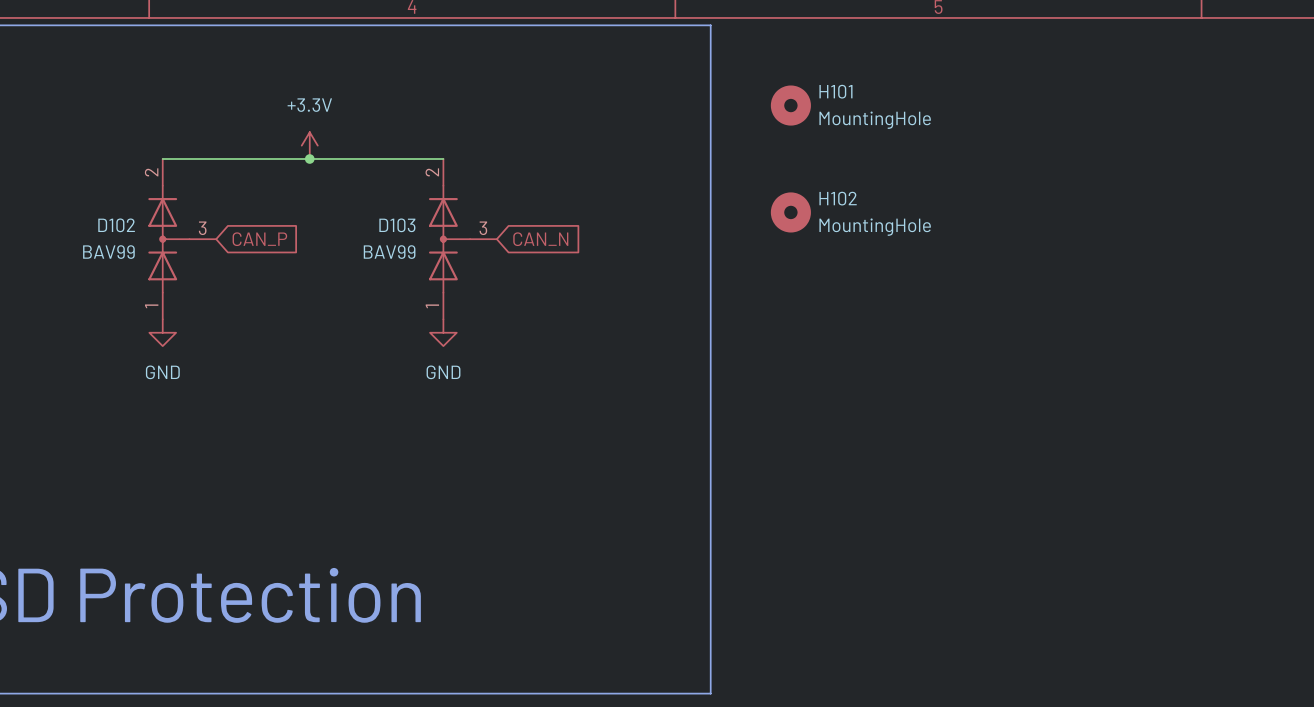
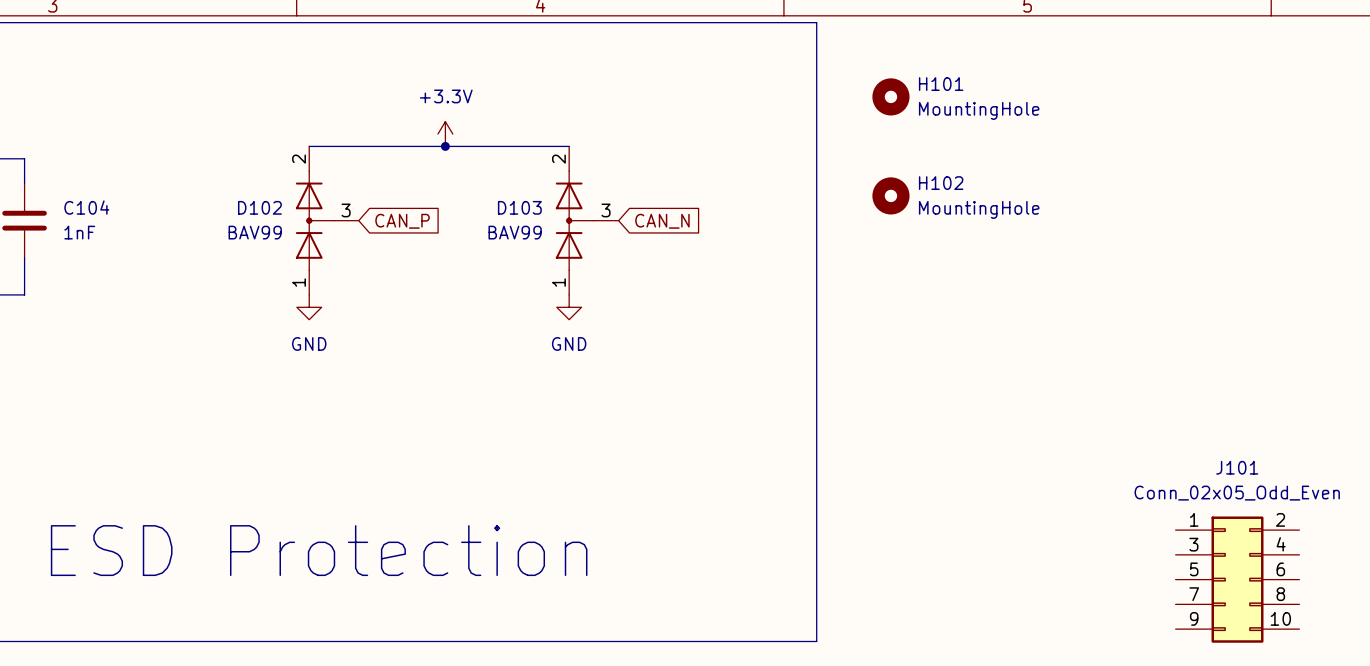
J101: none -> Conn_02x05_Odd_Even (1237, 579)

